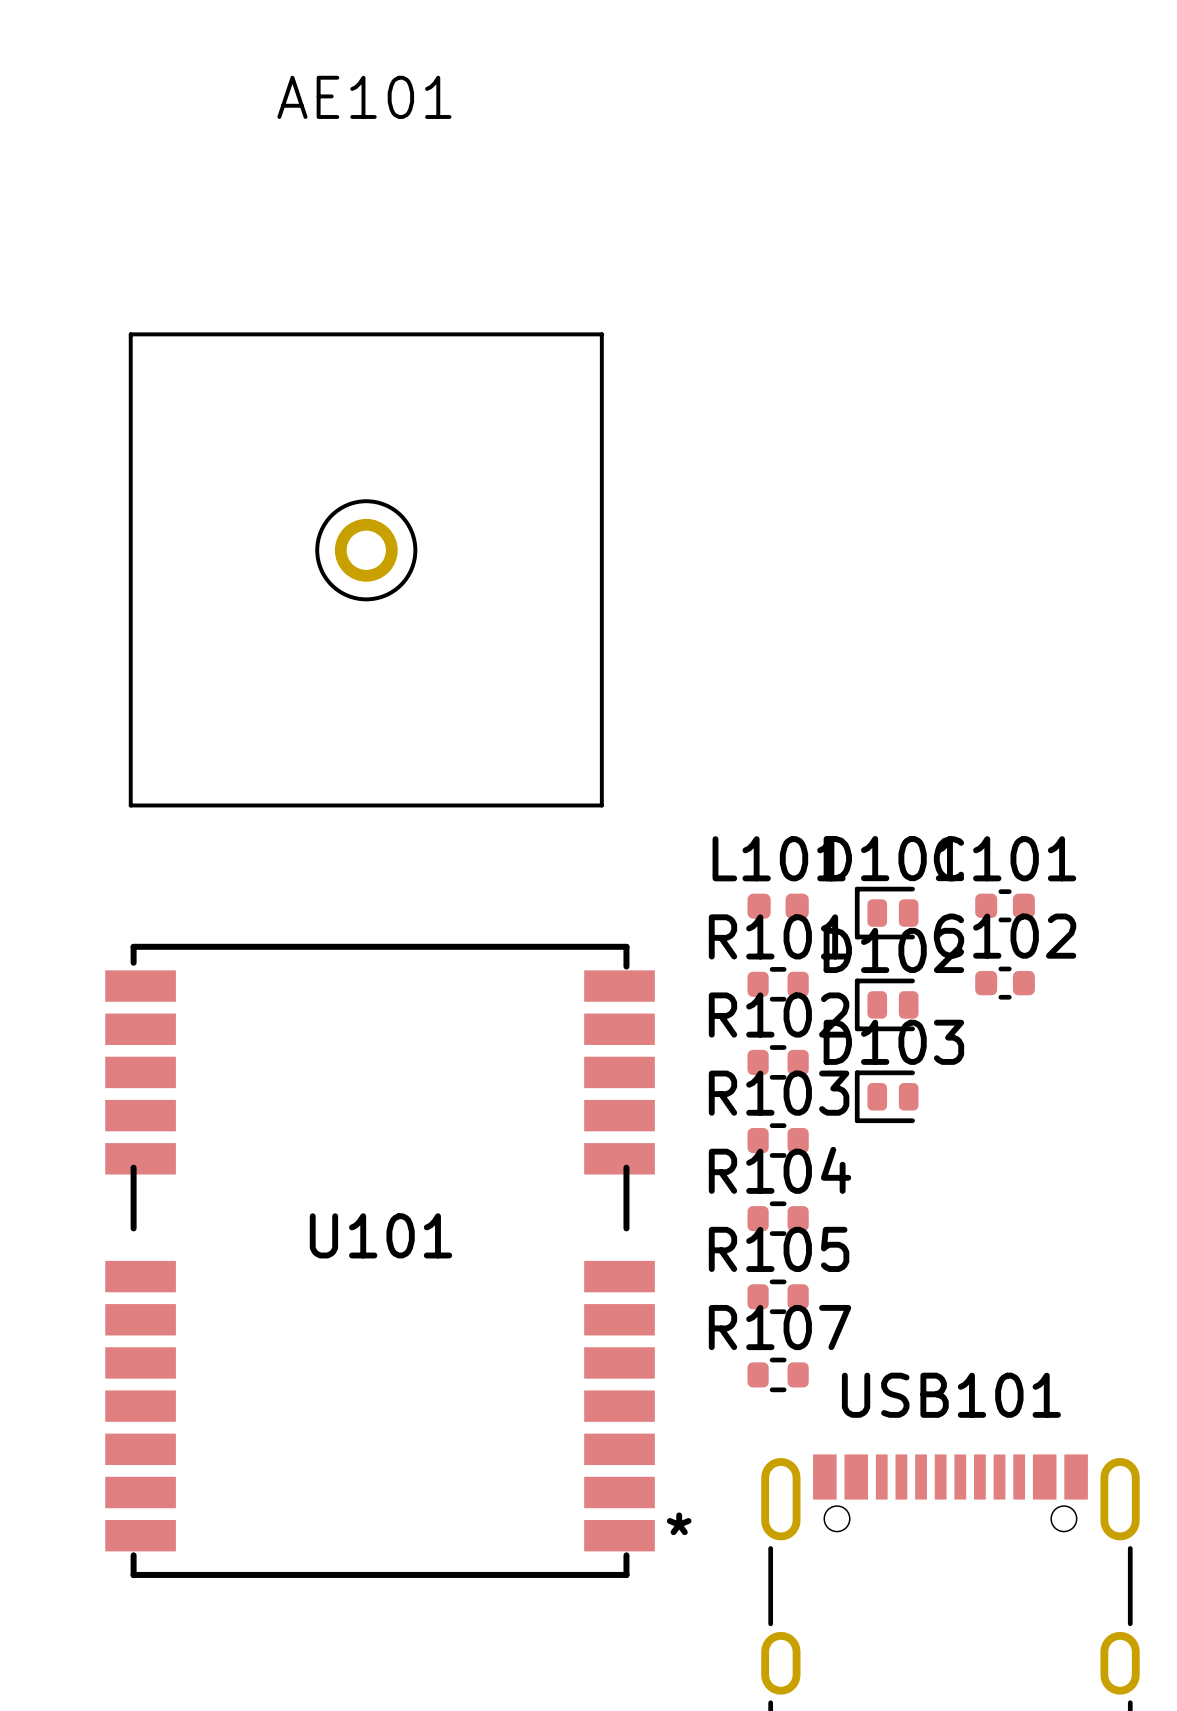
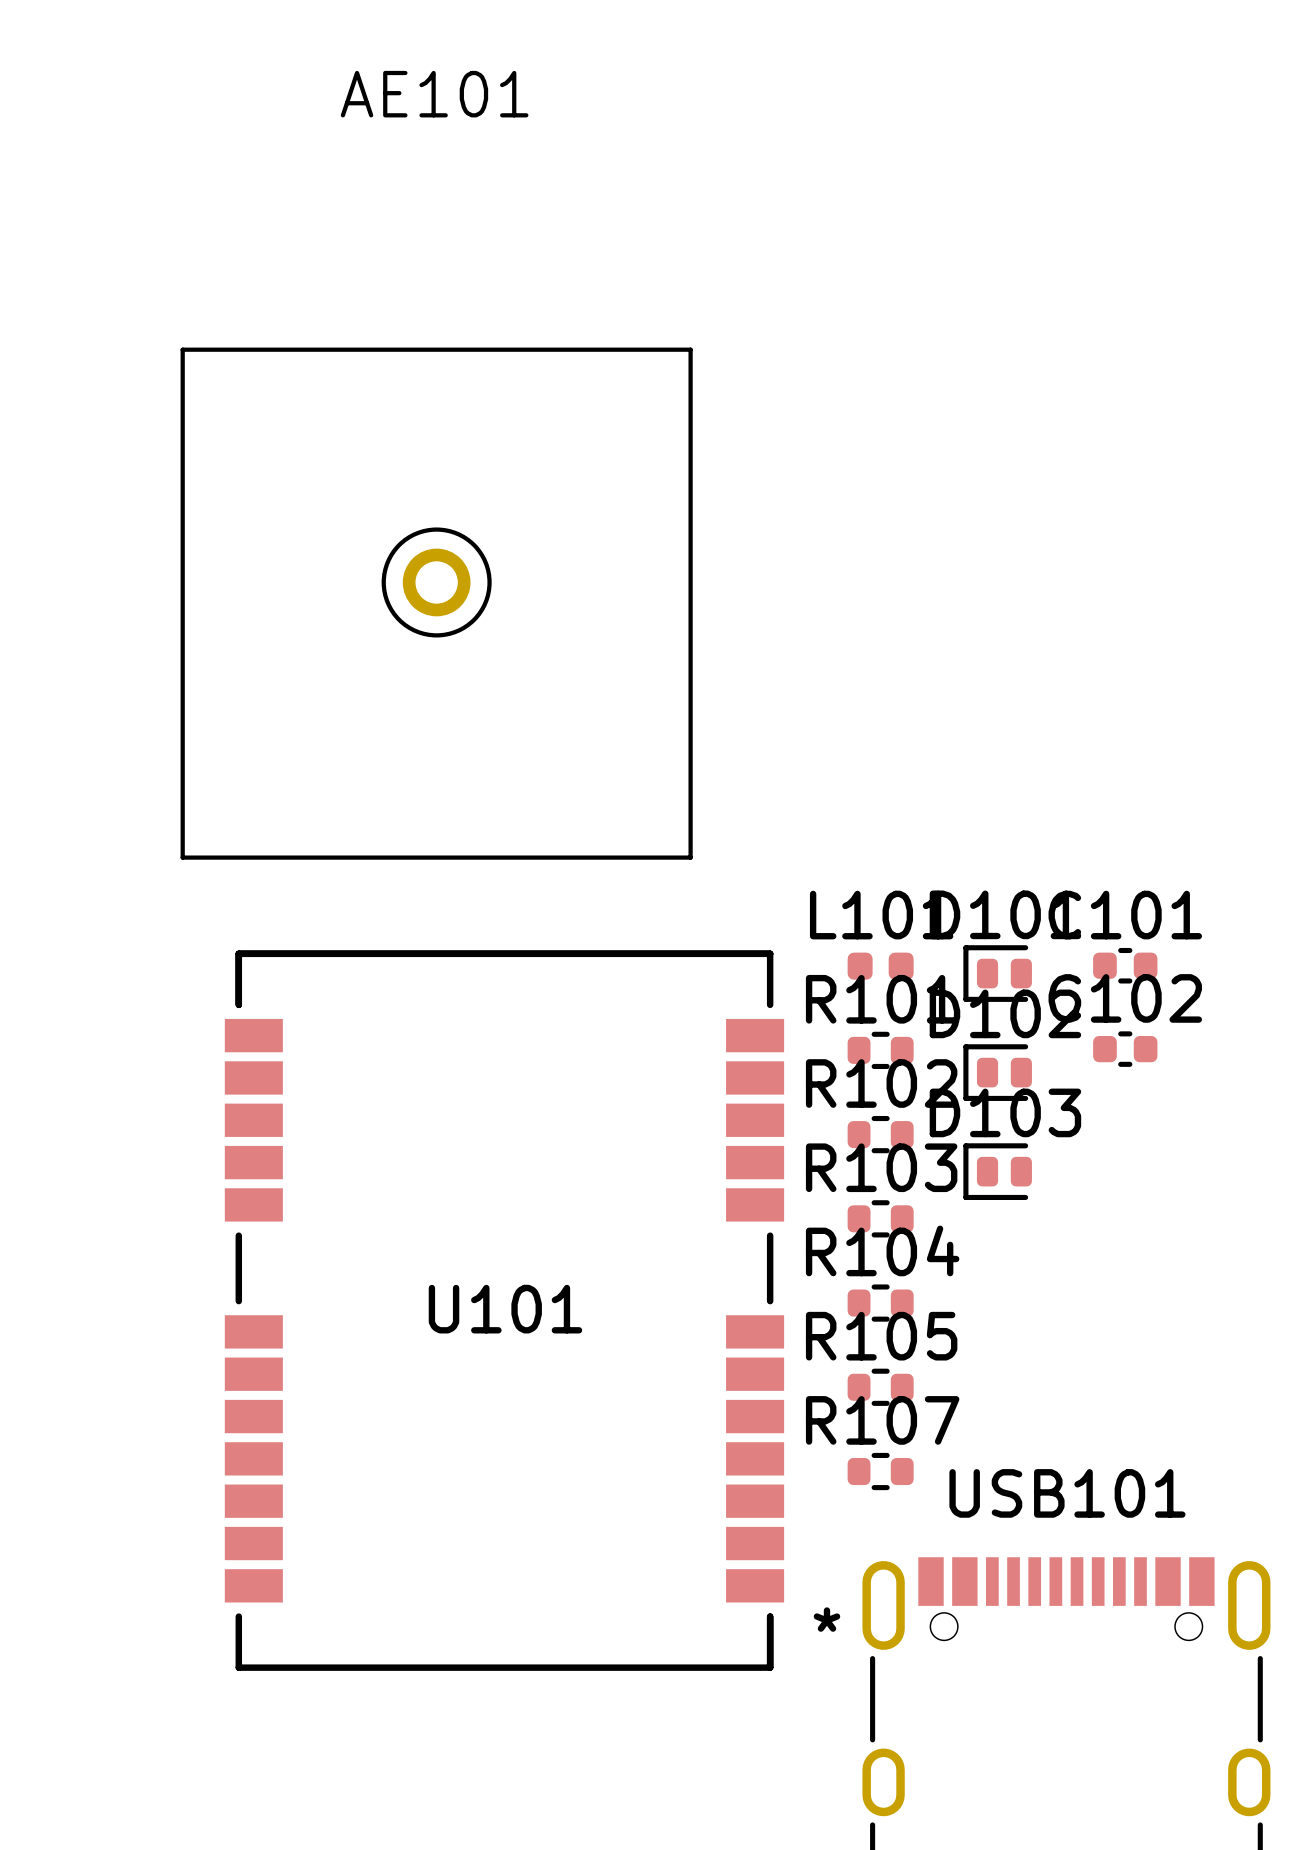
U101 footprint: [105, 943, 655, 1579] -> [224, 950, 785, 1671]

